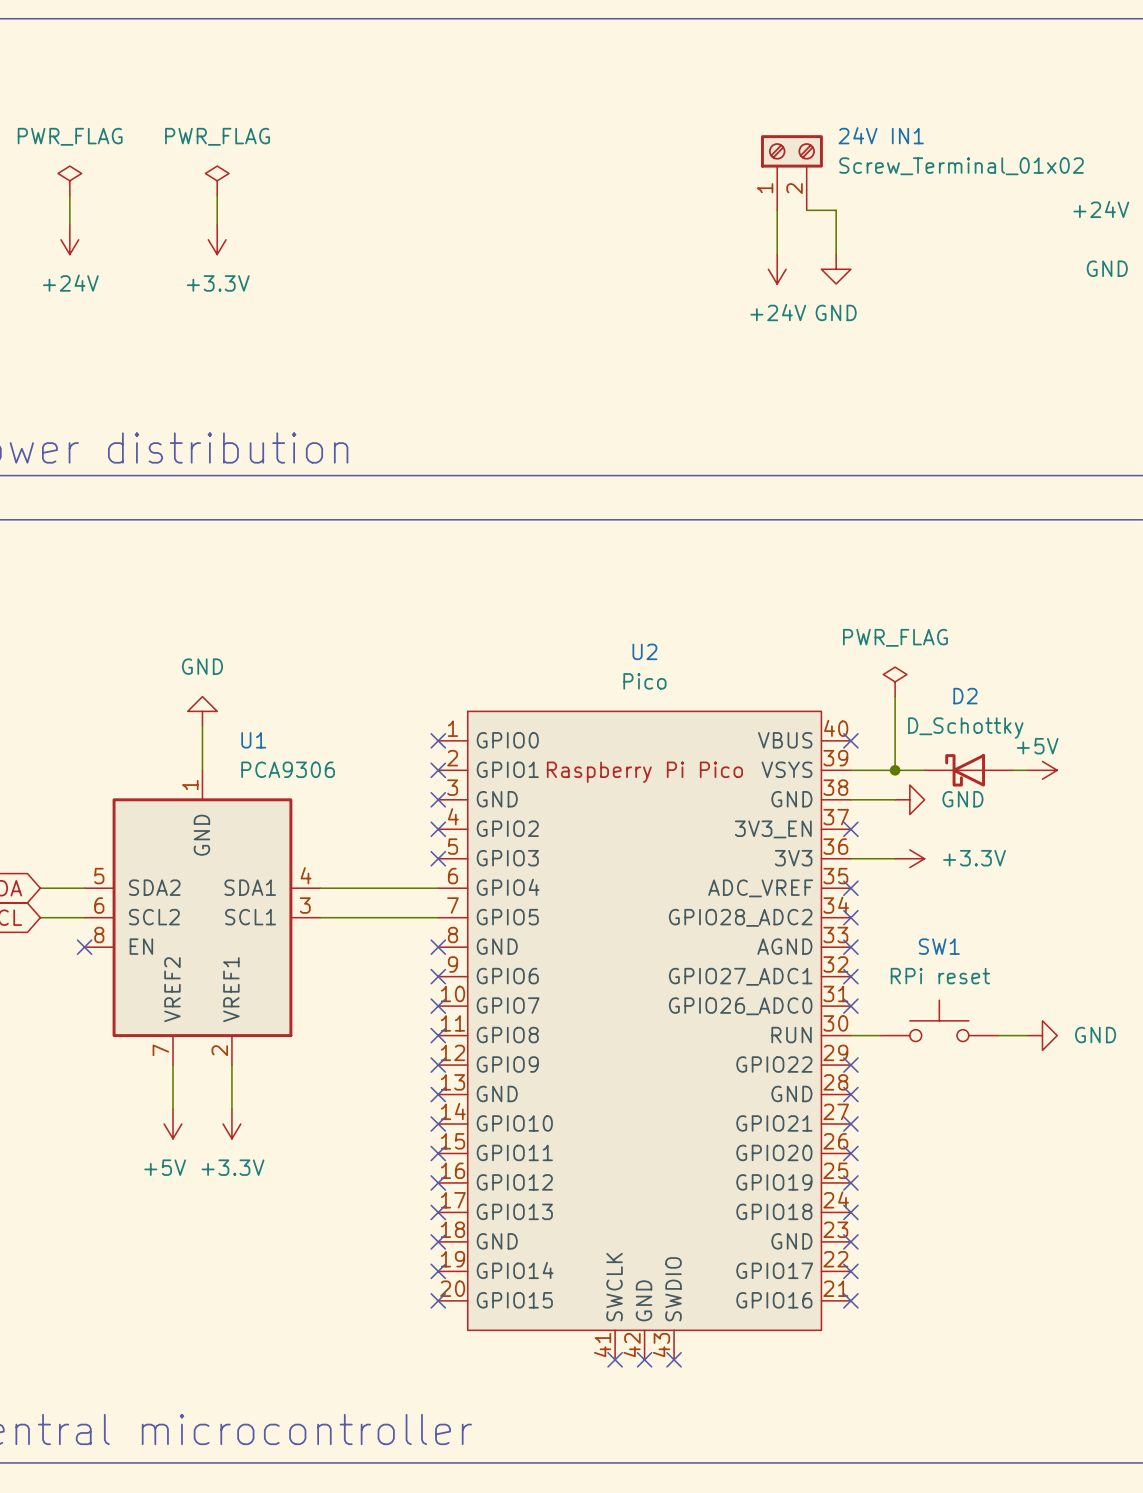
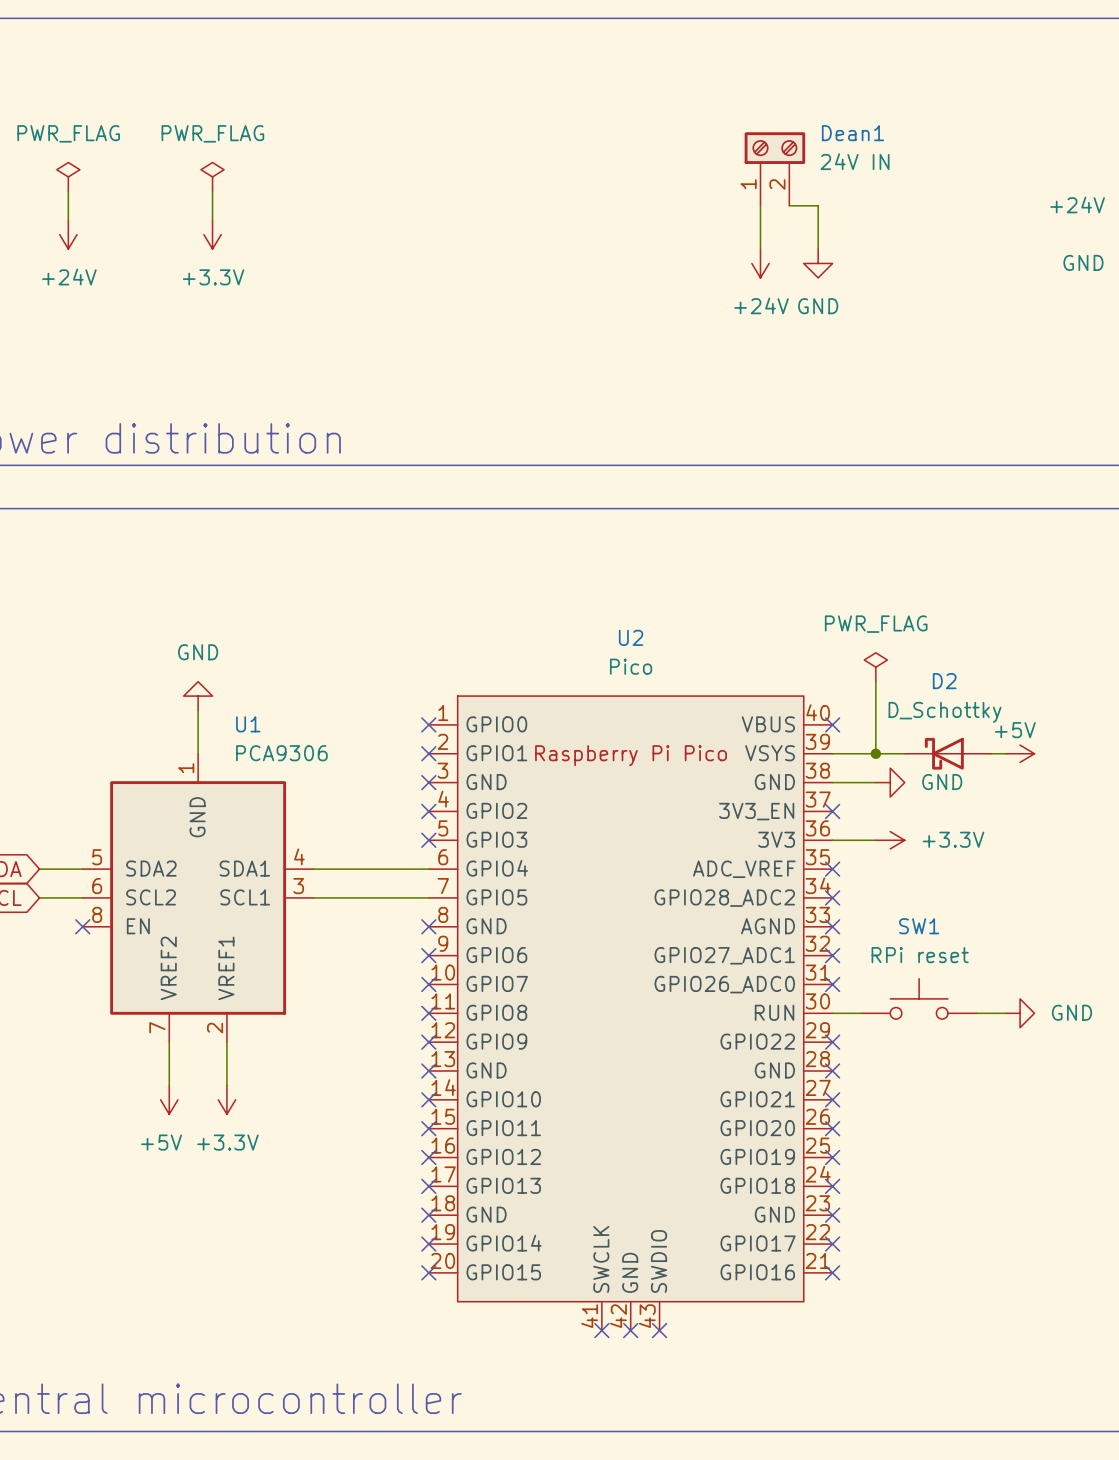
24V IN1 name: 24V IN1 (881, 135) -> Dean1 (852, 133)
24V IN1 value: Screw_Terminal_01x02 (961, 166) -> 24V IN (855, 161)

